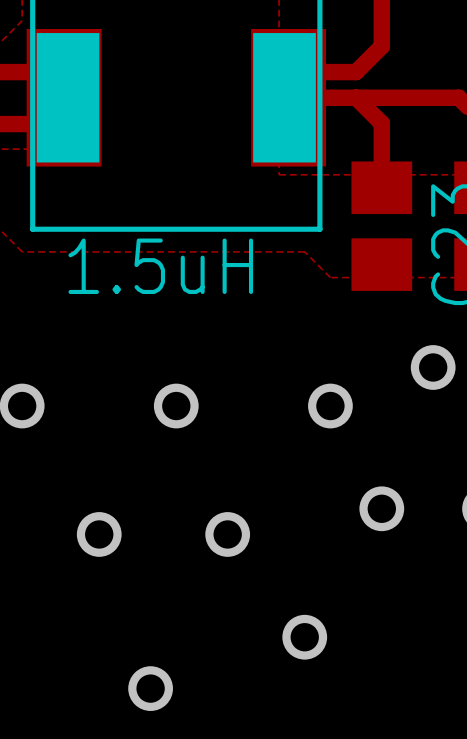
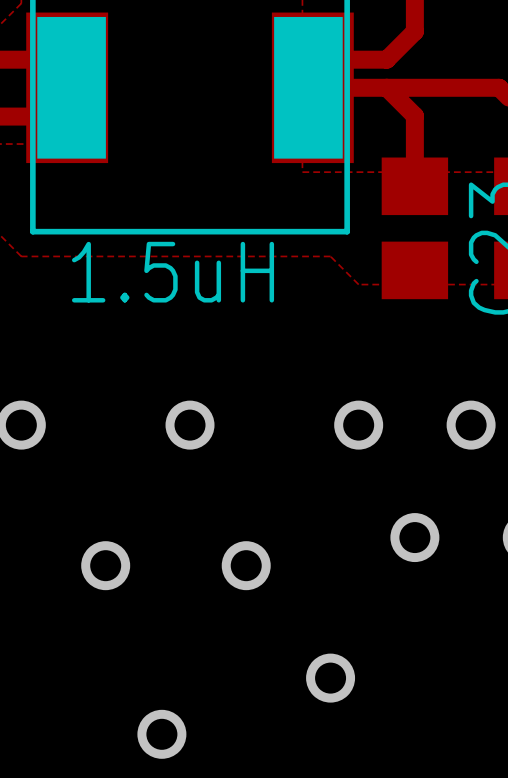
via position: (433, 367) -> (471, 425)

